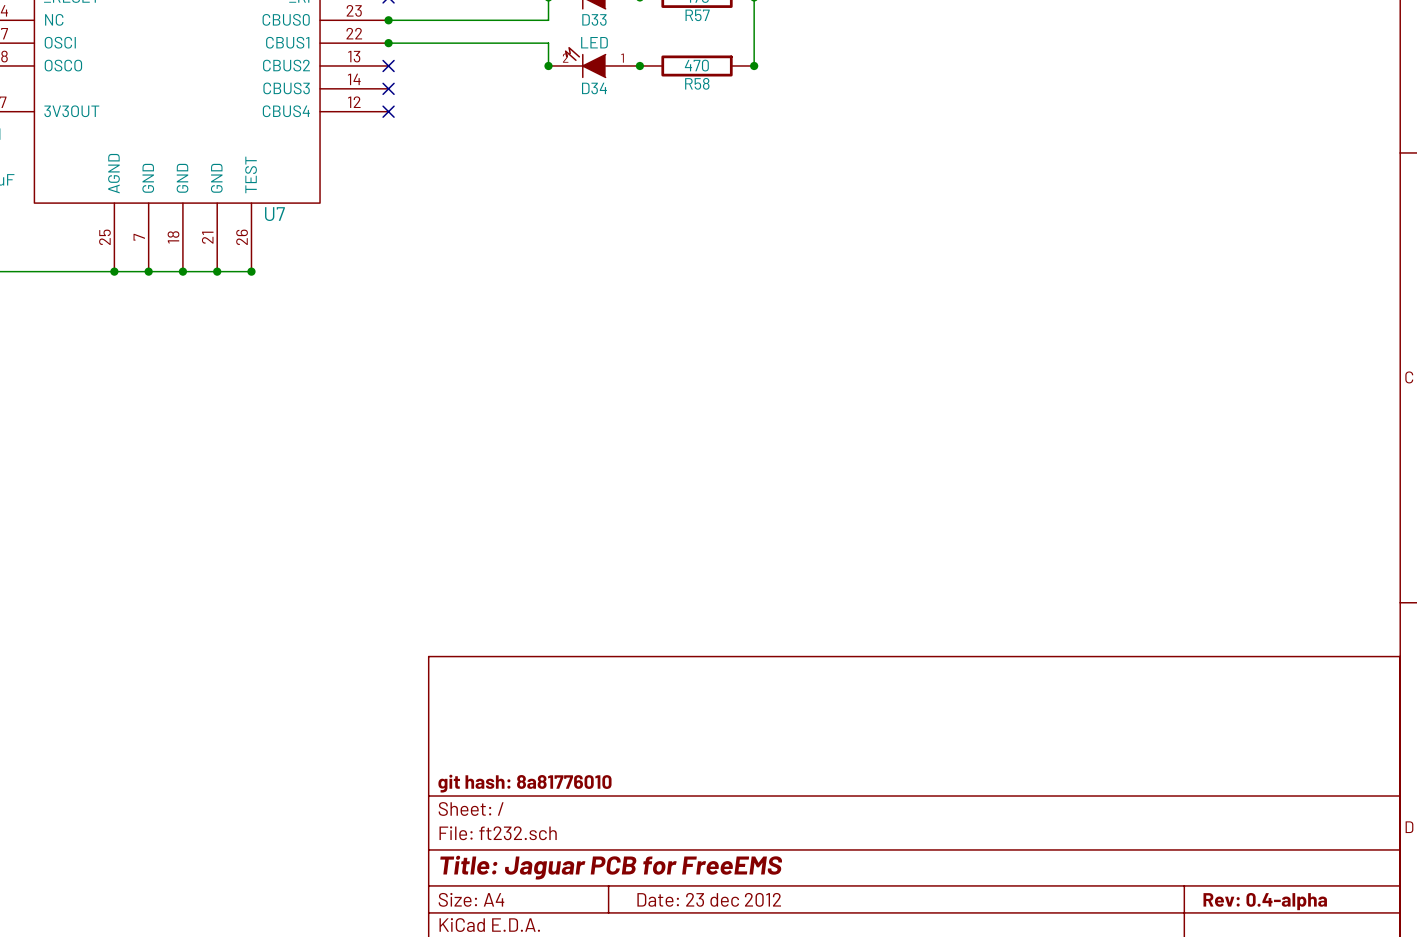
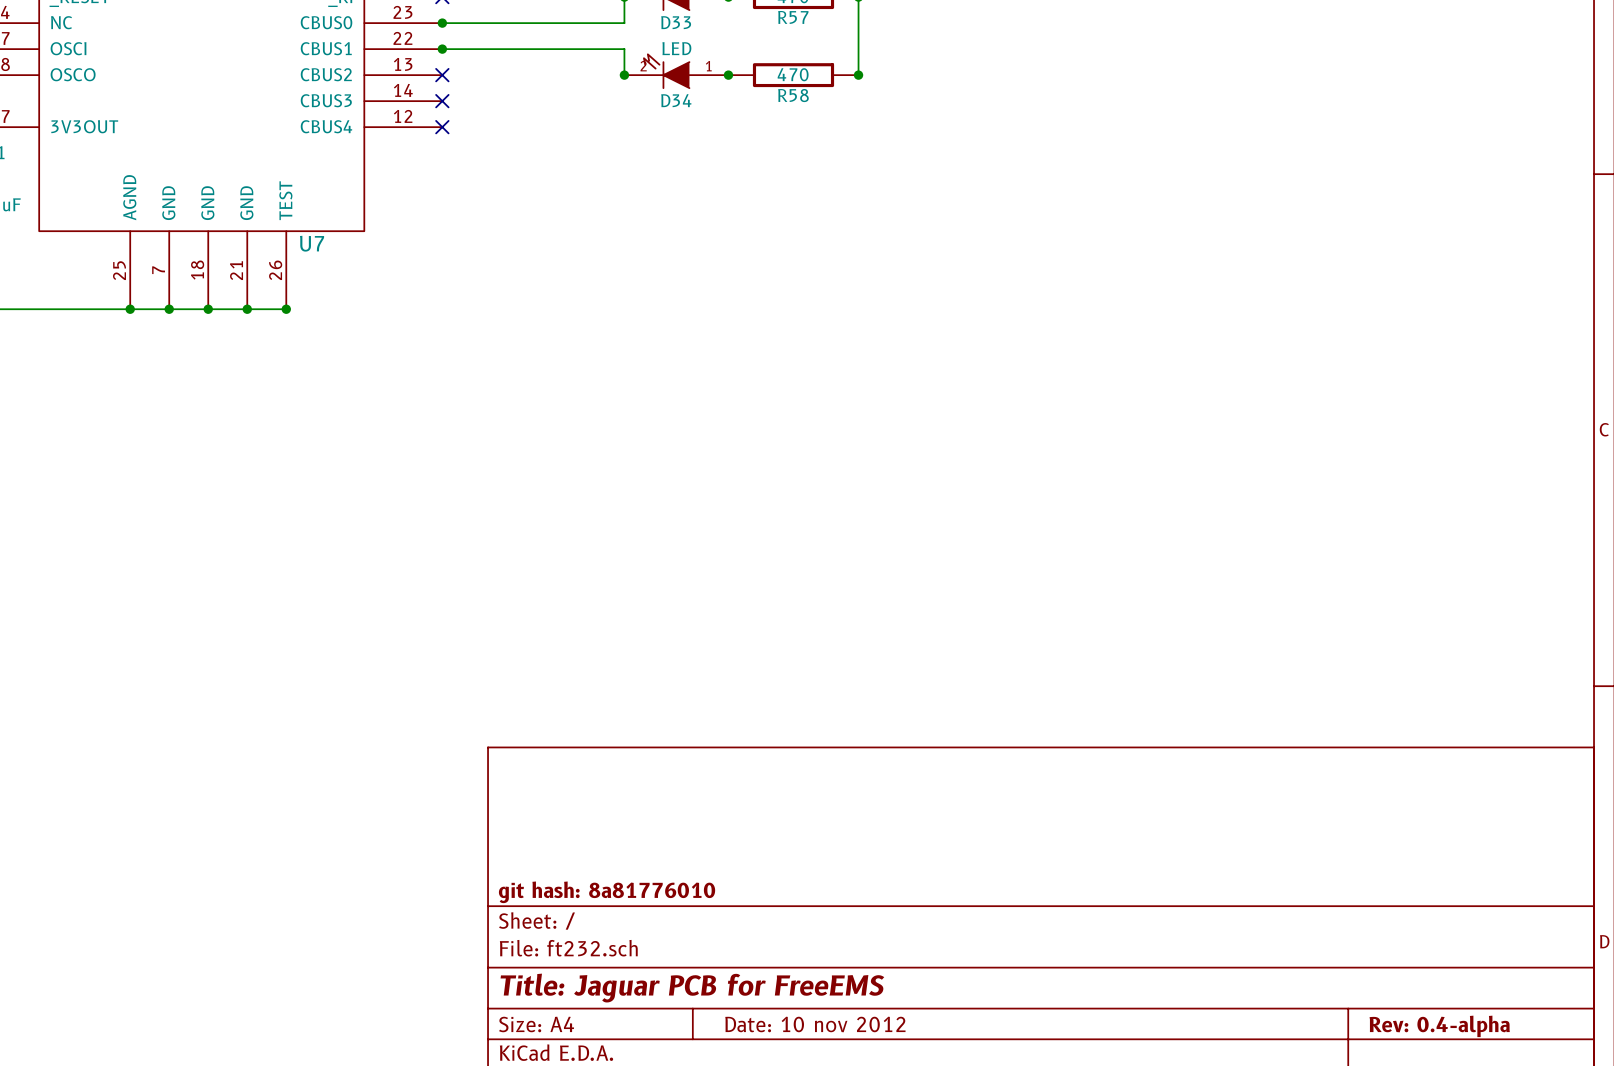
title block: Date: 23 dec 2012 (709, 899) -> Date: 10 nov 2012 (815, 1024)

